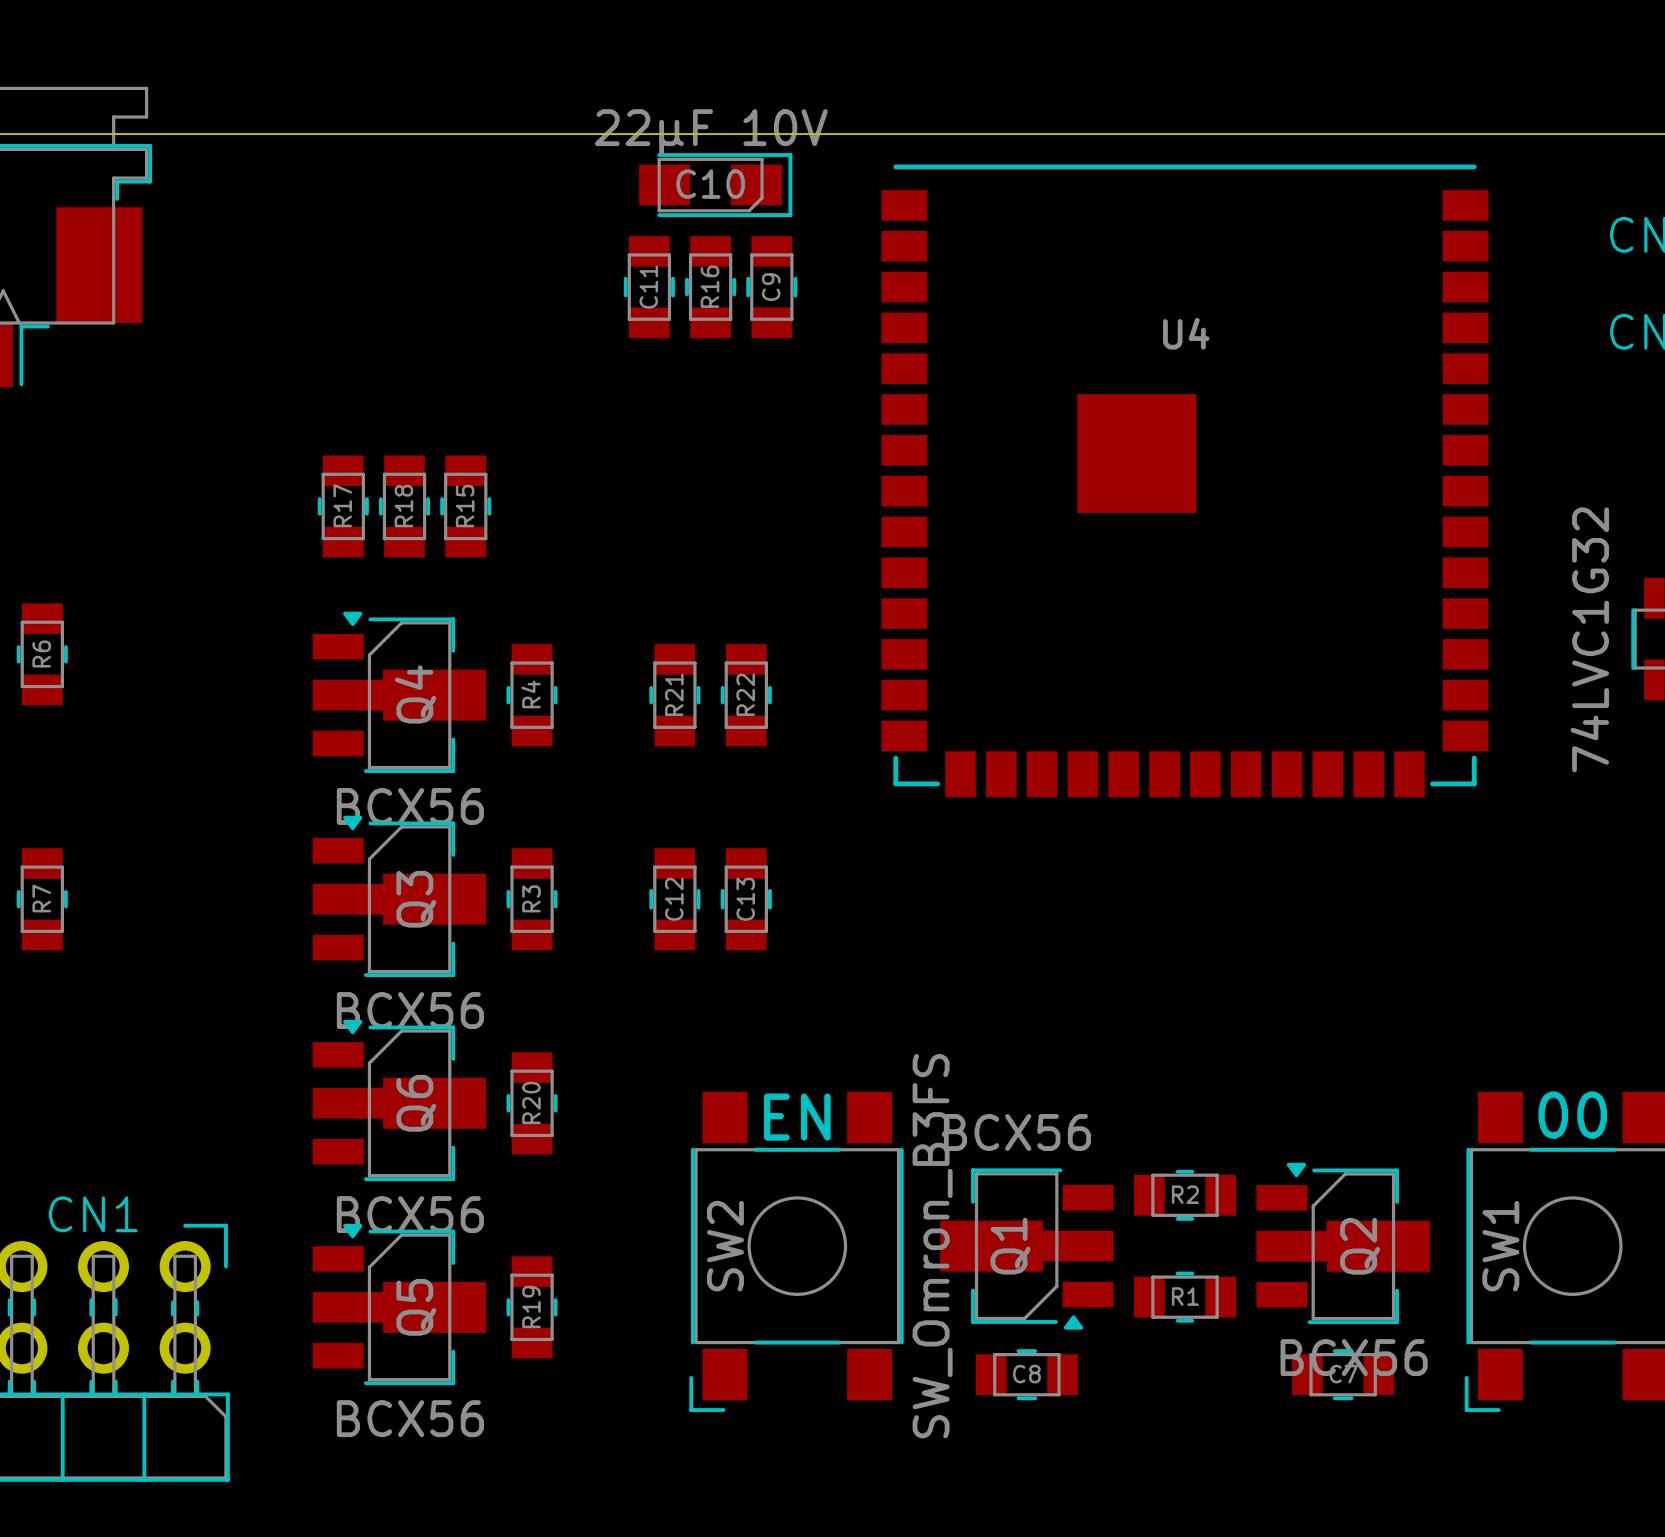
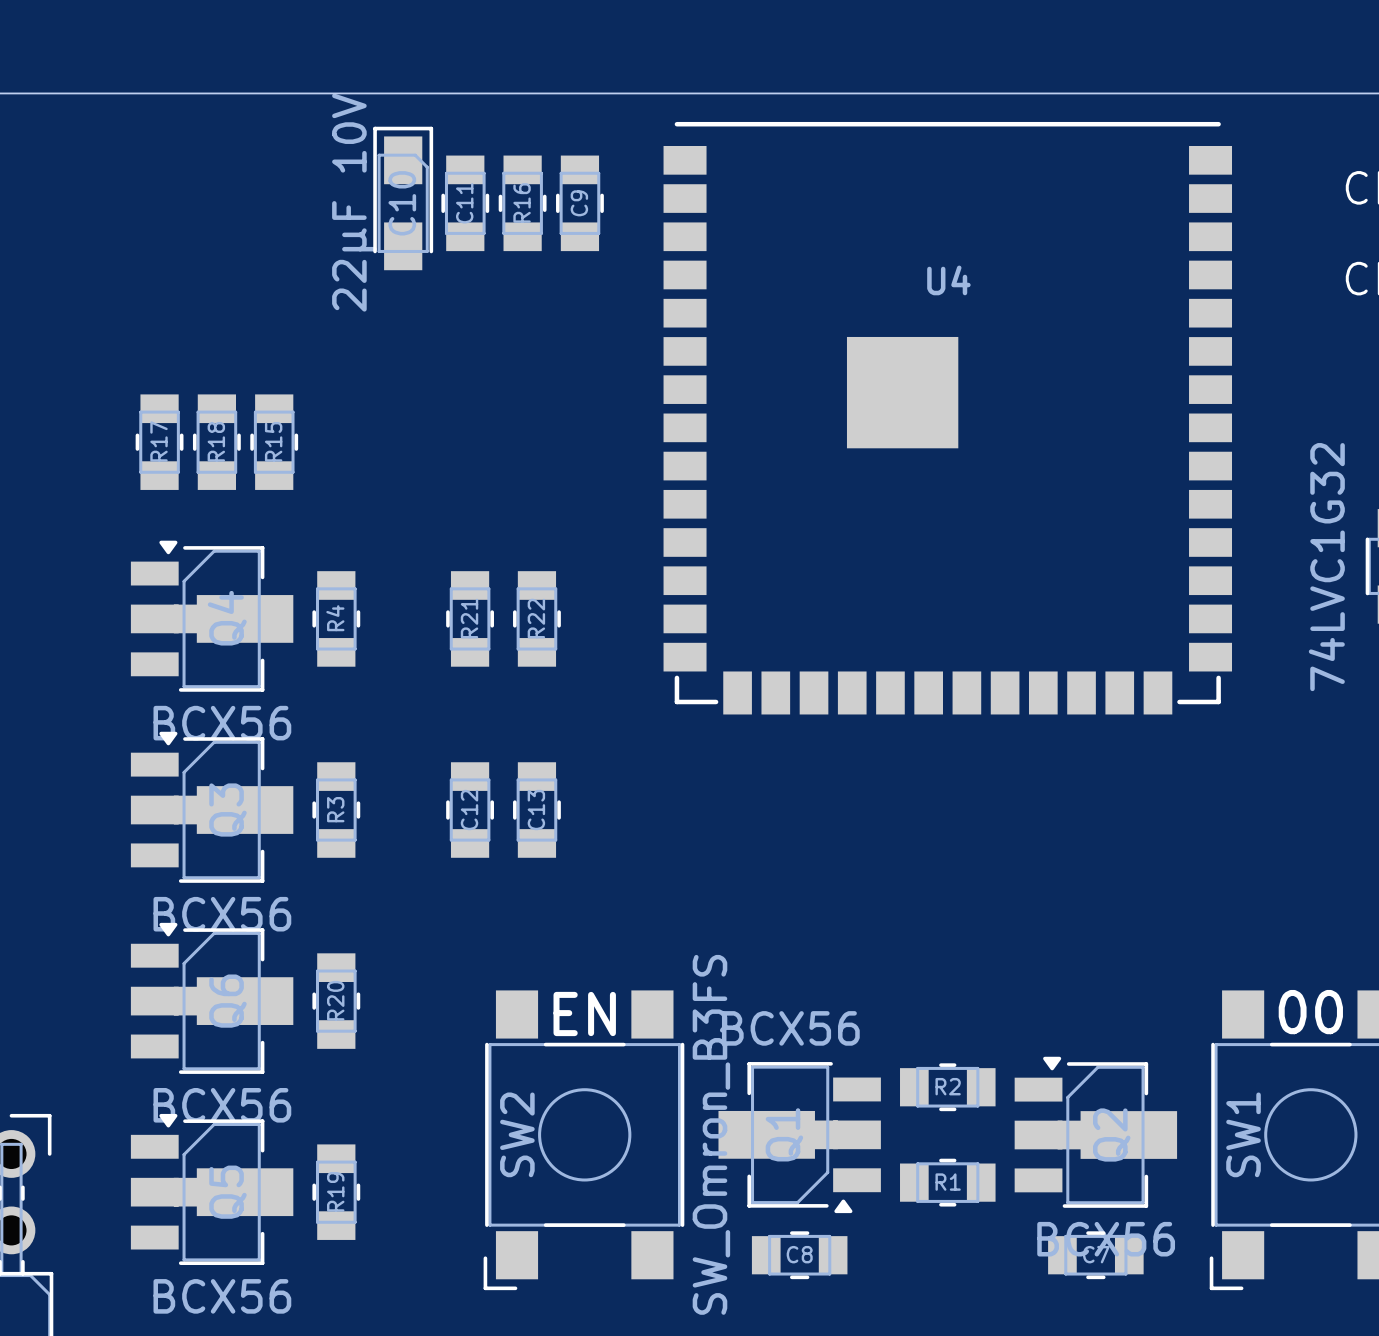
C10 rotation: 0° (715, 185) -> 90° counterclockwise (403, 198)
C10 position: (715, 185) -> (403, 198)
C11 position: (649, 287) -> (465, 203)
R16 position: (710, 287) -> (522, 203)
C9 position: (771, 287) -> (579, 203)

